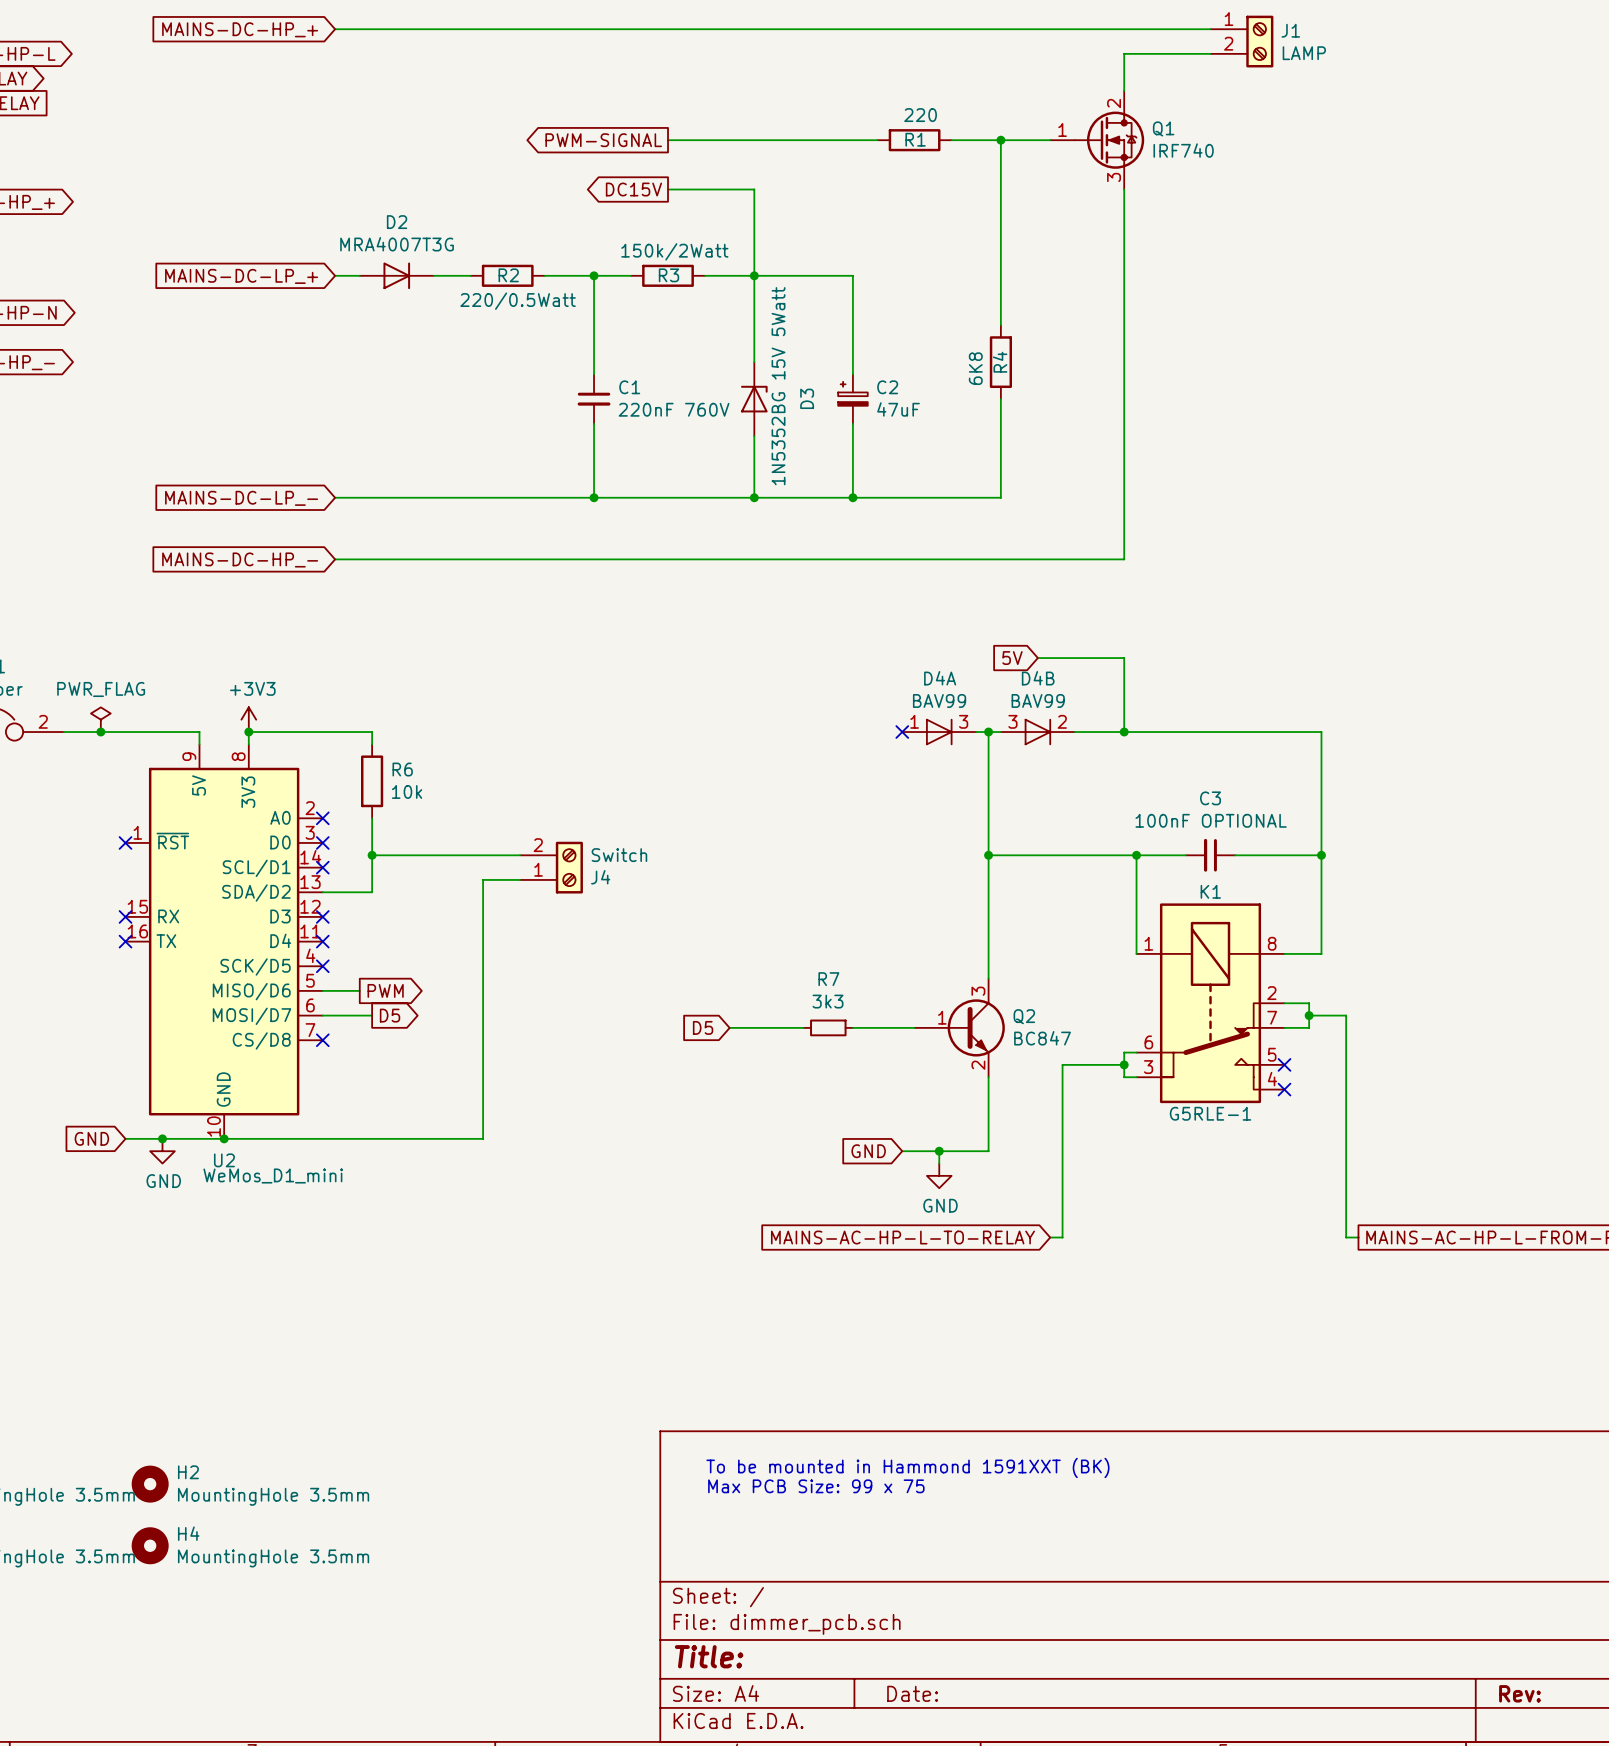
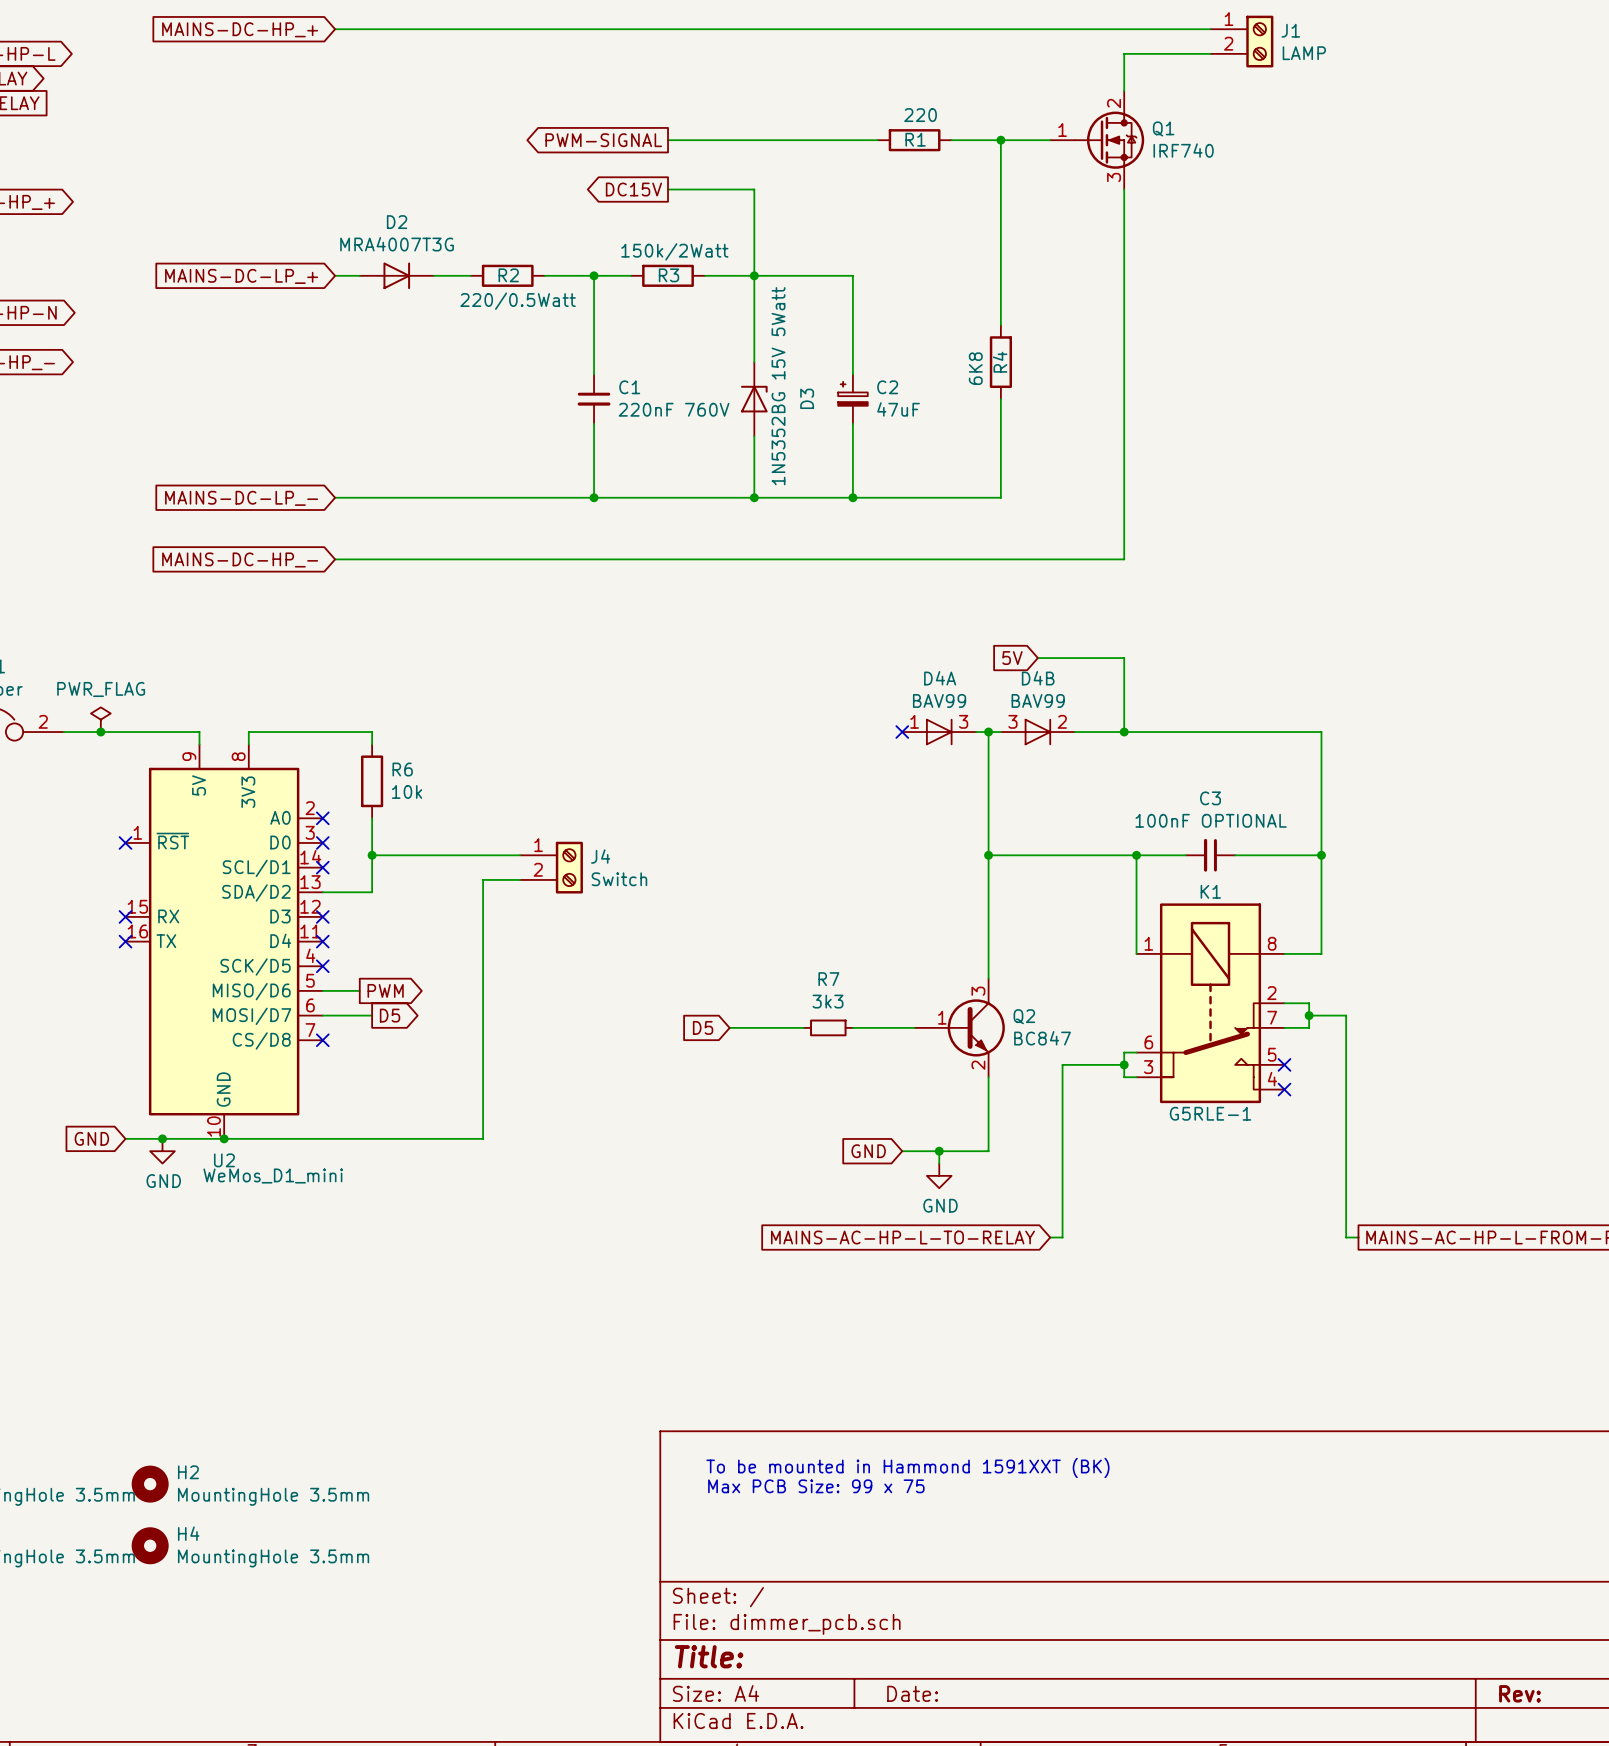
power symbol: +3V3 (248, 719) -> none
junction: (248, 732) -> none
J4 flip: as is (569, 867) -> up-down (569, 867)

